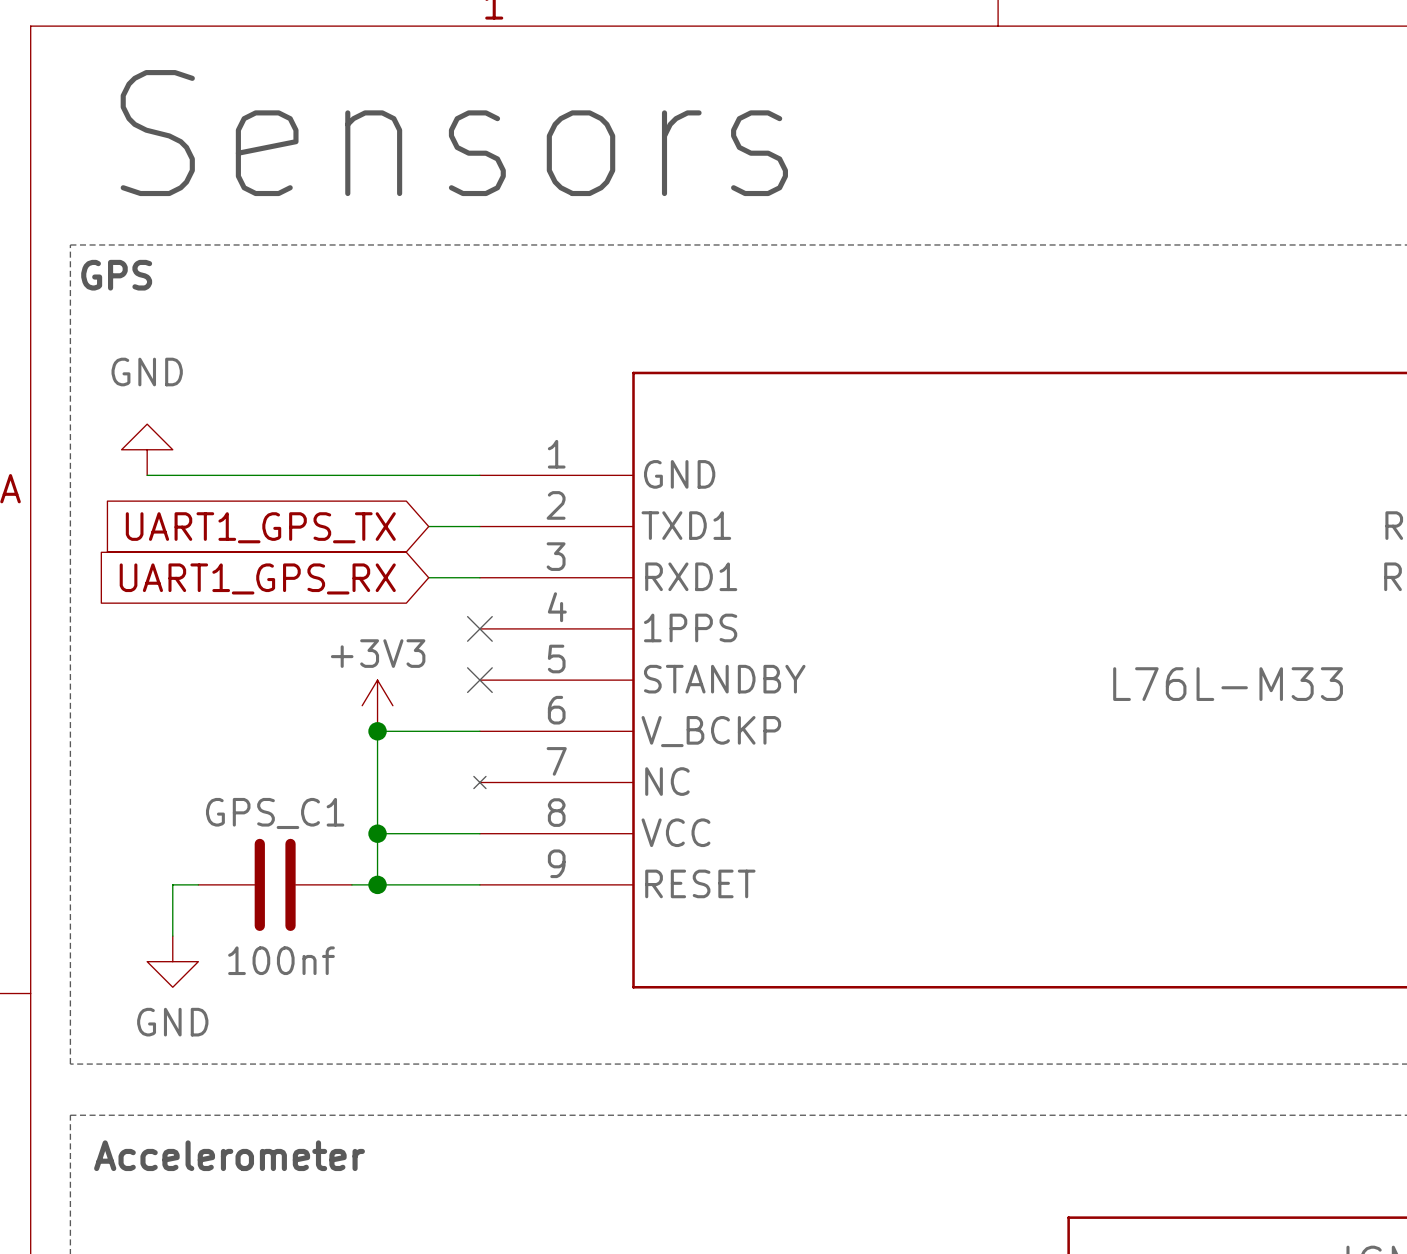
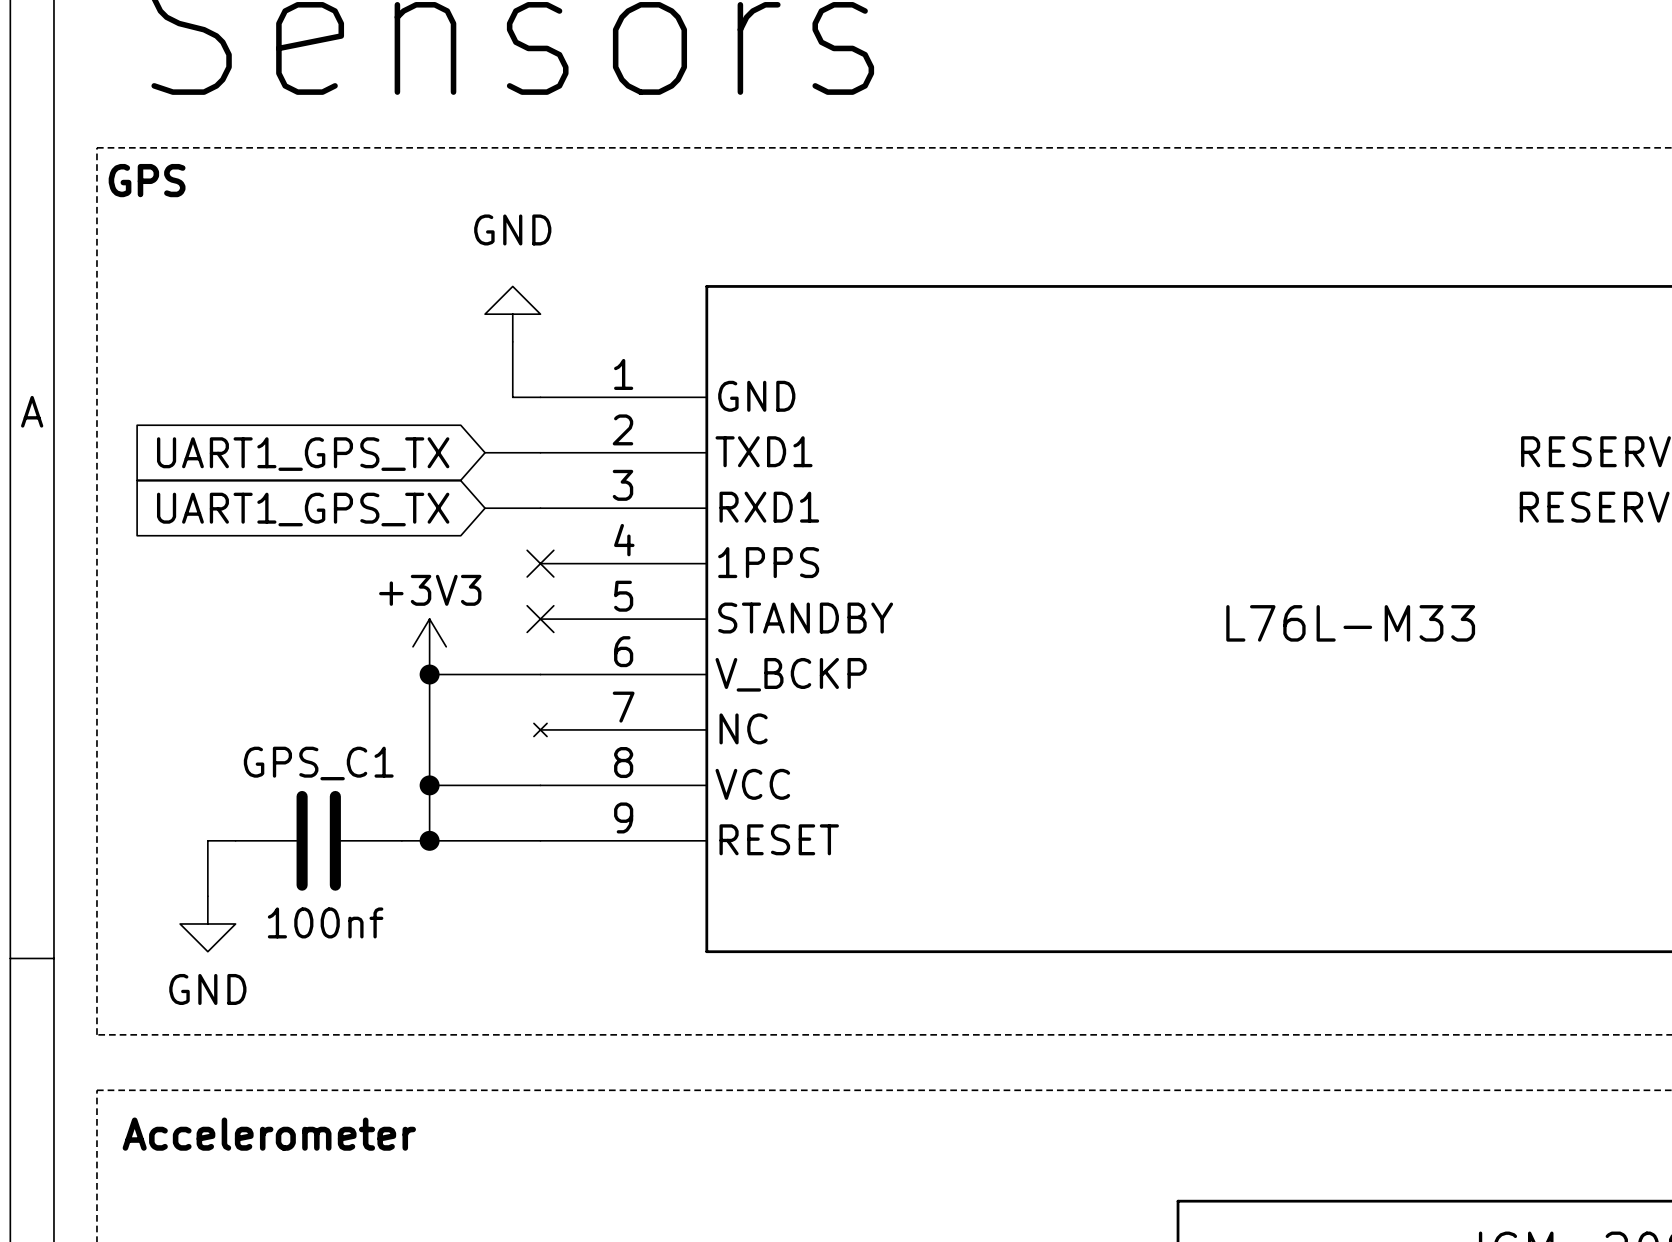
power symbol position: GND (147, 449) -> GND (512, 314)
wire: (147, 475) (454, 475) -> (512, 341) (512, 397)
global label: UART1_GPS_RX (257, 578) -> UART1_GPS_TX (303, 509)

